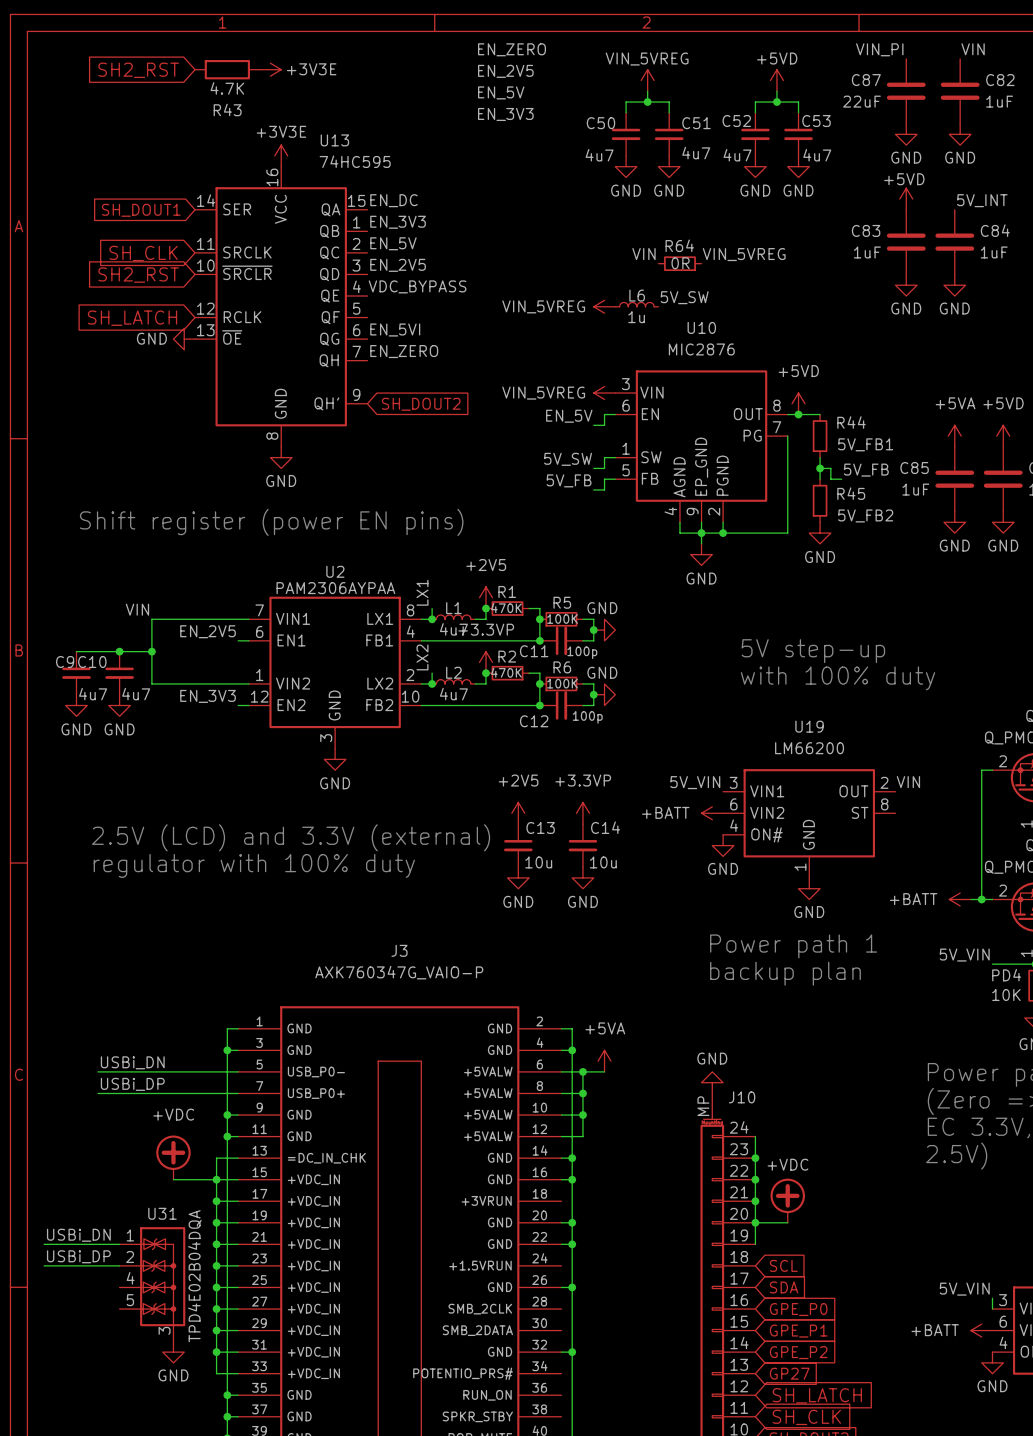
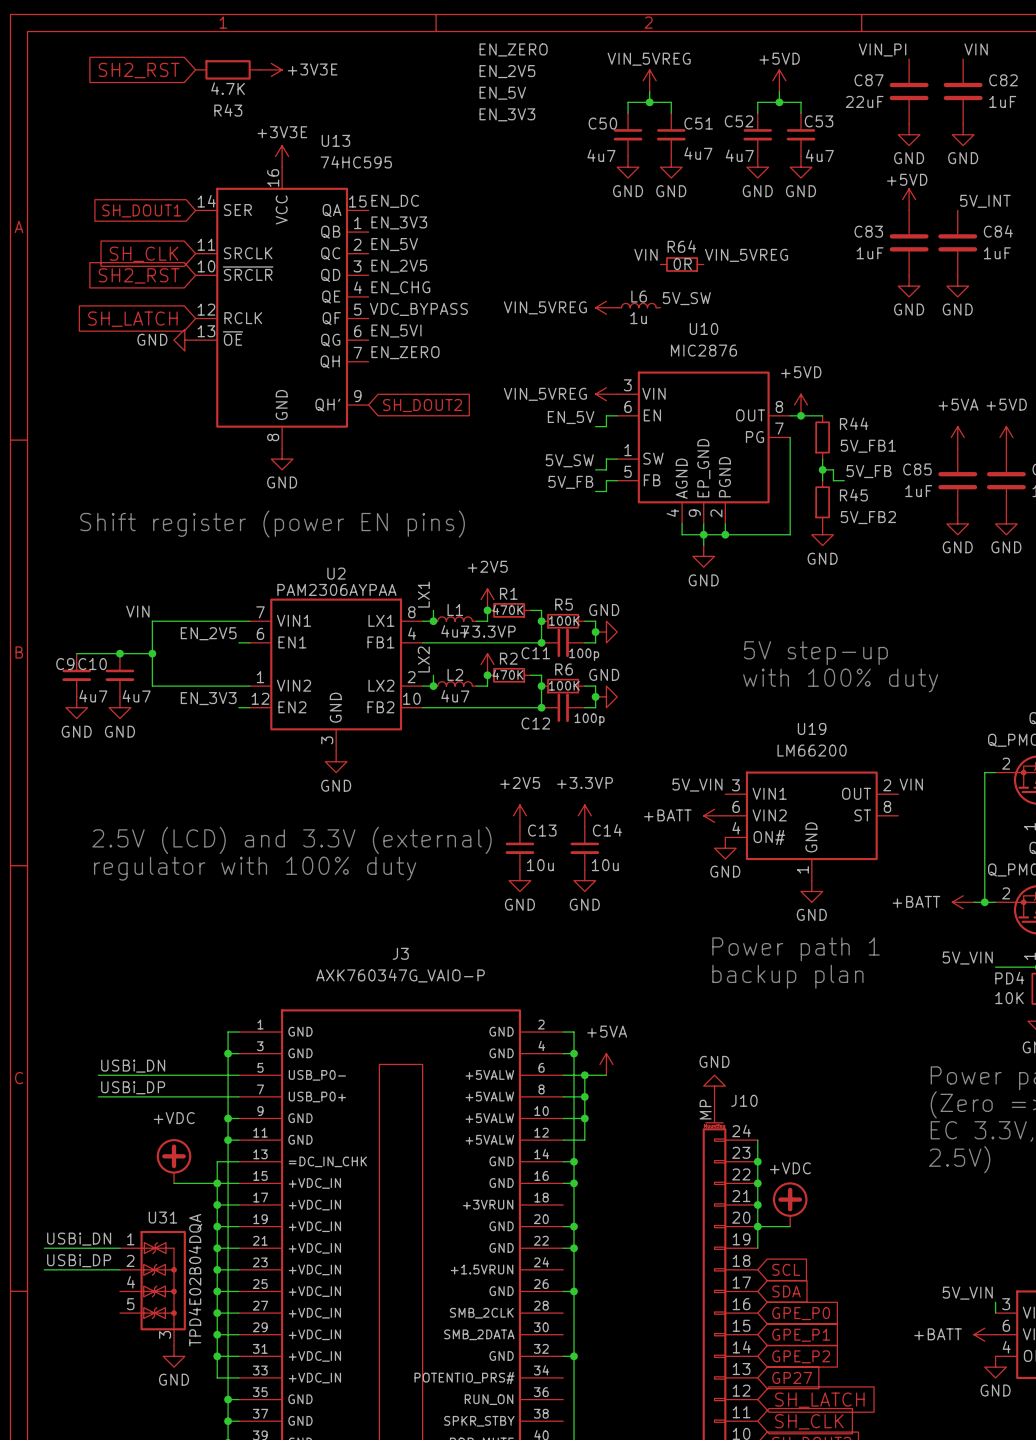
label: VDC_BYPASS (417, 286) -> EN_CHG (400, 287)
label: none -> VDC_BYPASS (418, 309)

